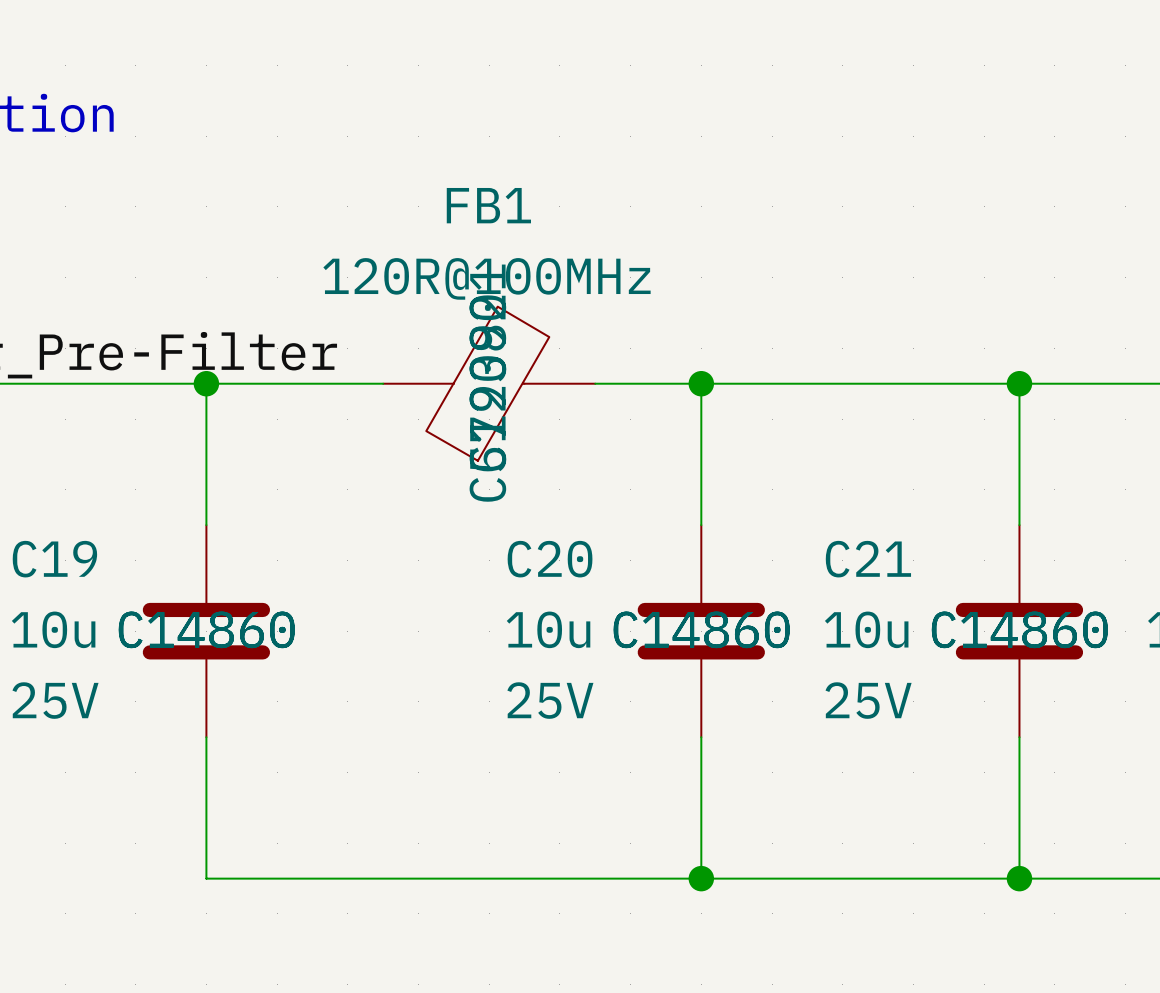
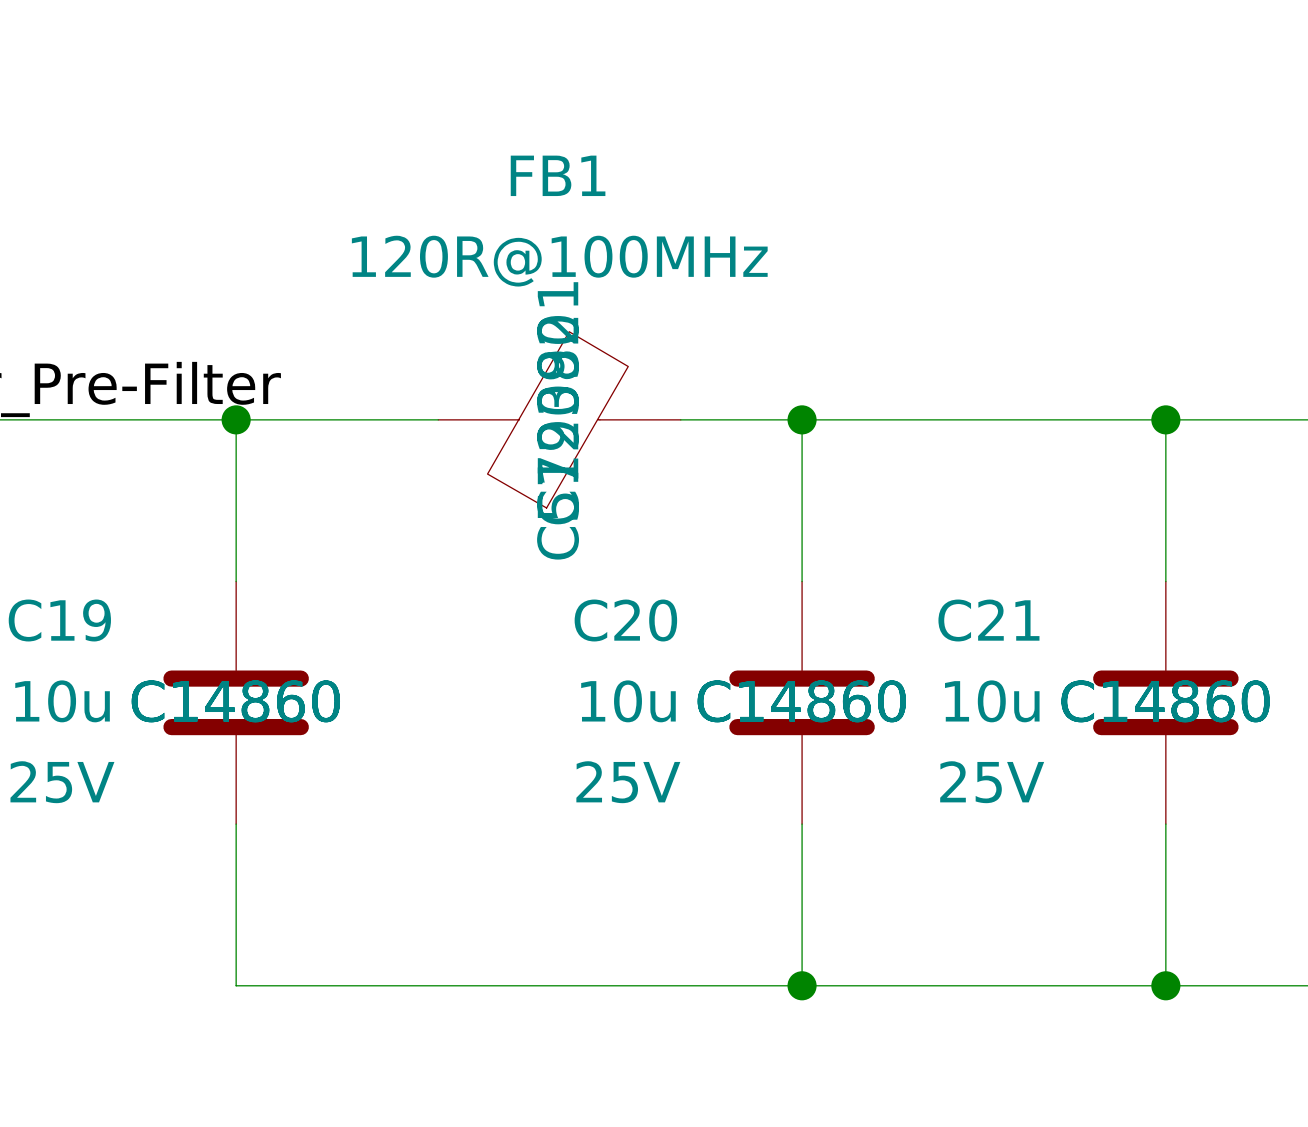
FB1 name position: FB1 (488, 205) -> FB1 (558, 175)
FB1 value position: 120R@100MHz (486, 278) -> 120R@100MHz (559, 261)

